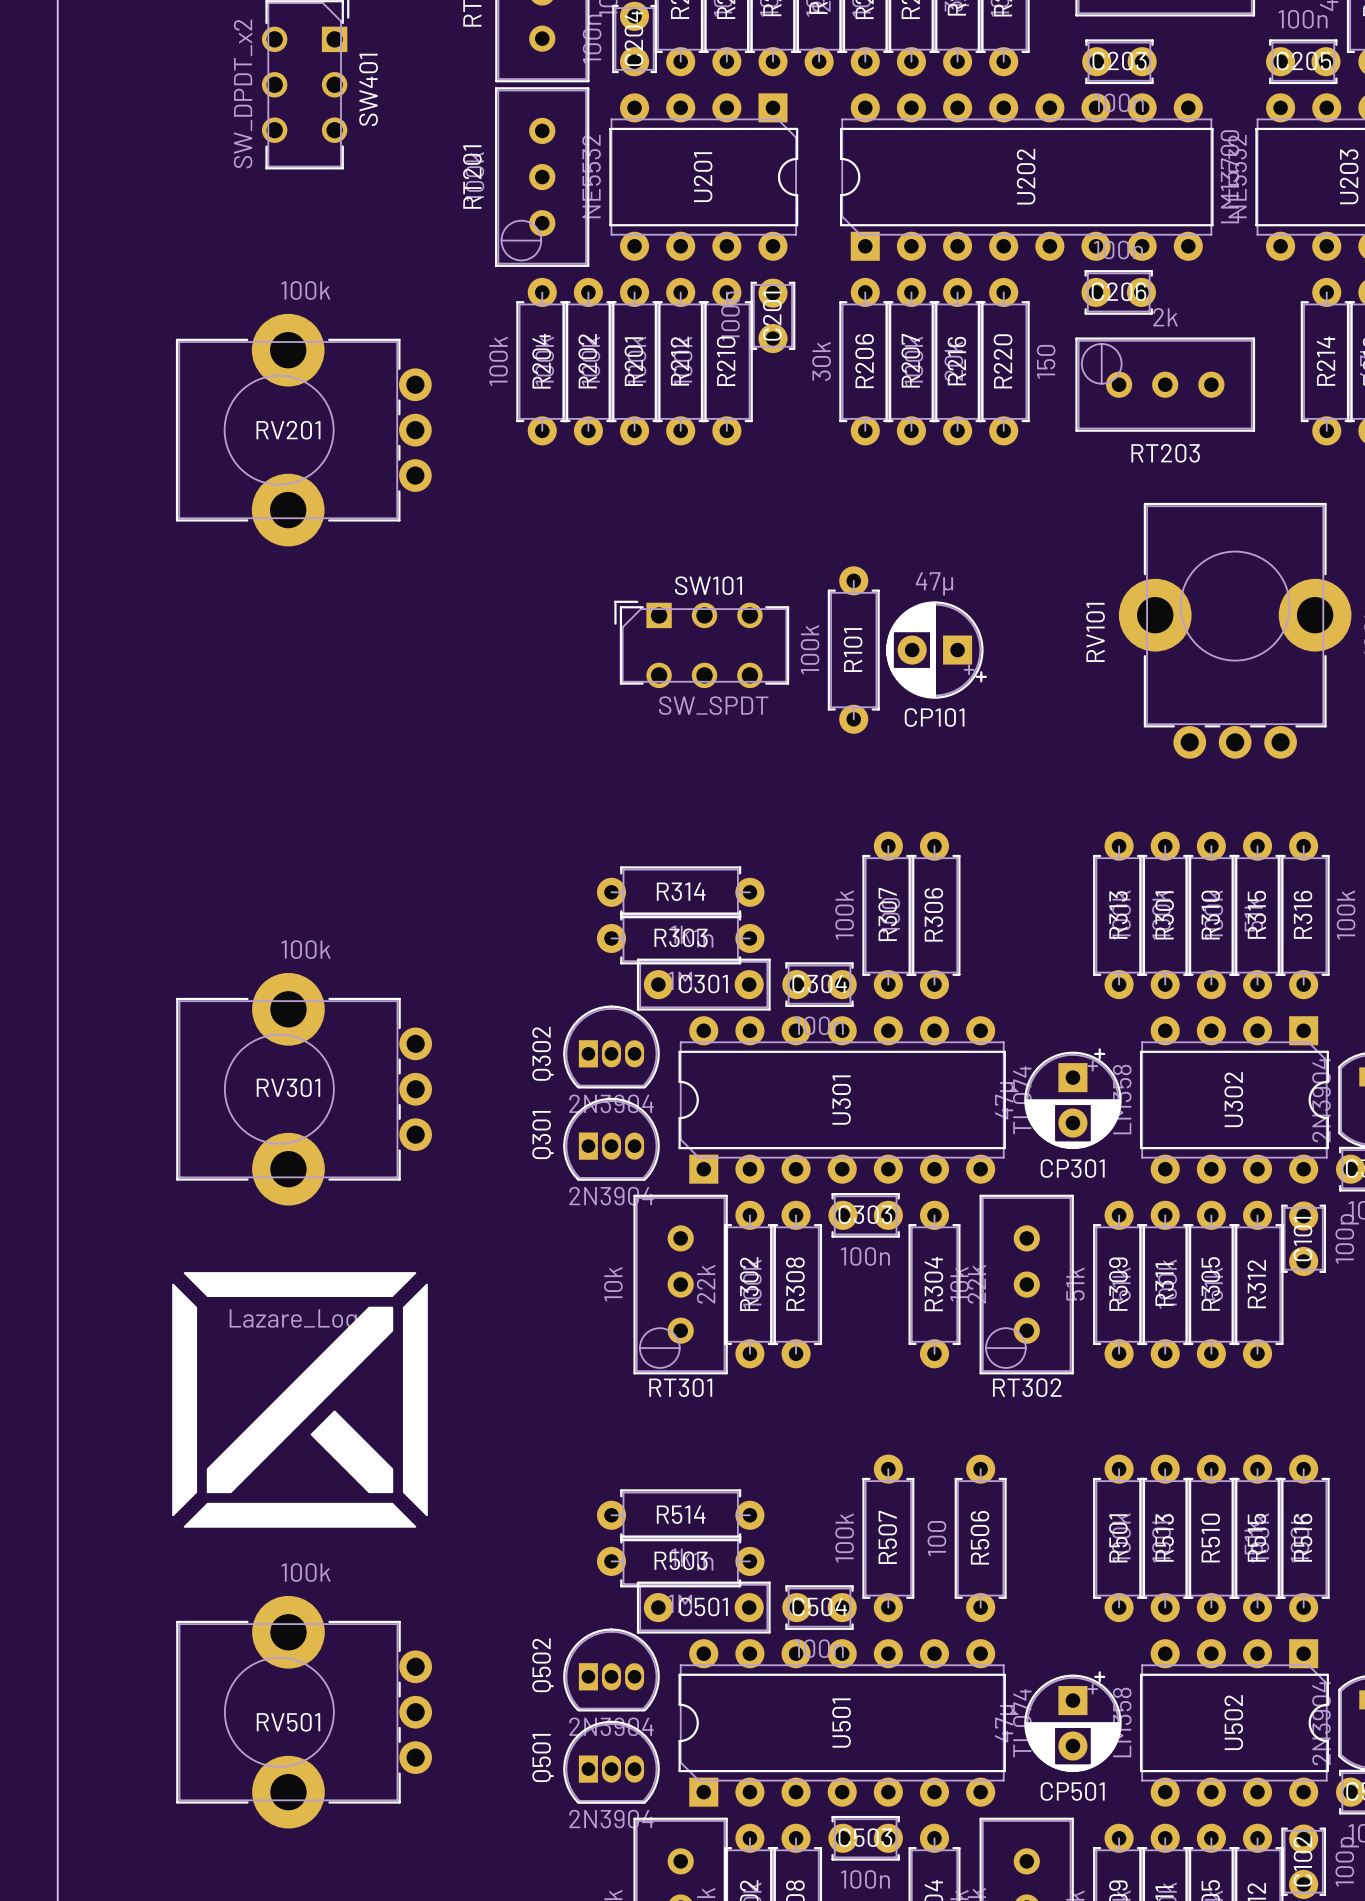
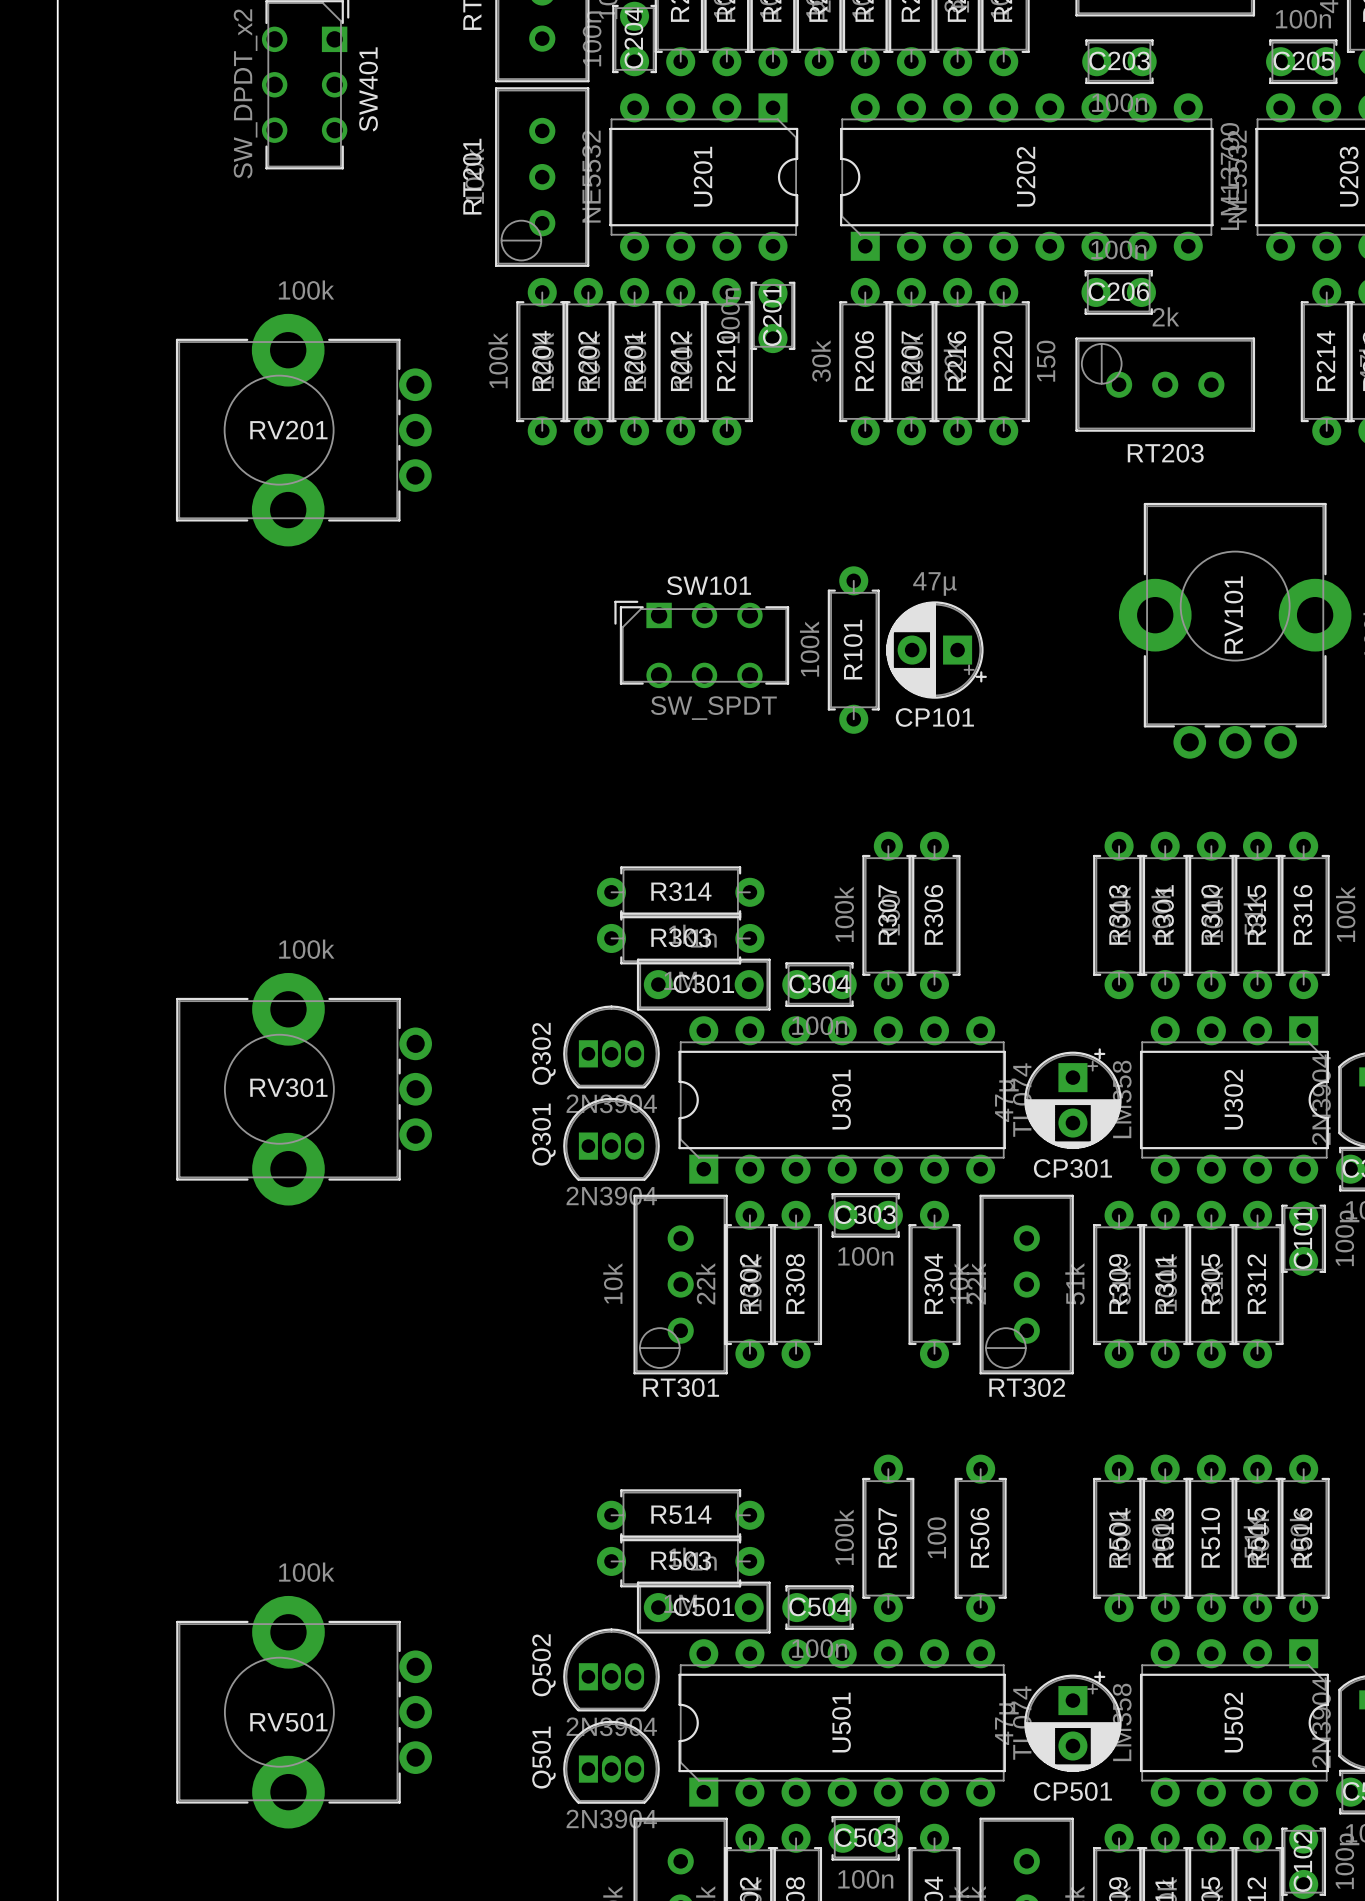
RV101 name position: RV101 (1095, 632) -> RV101 (1233, 615)
drawing: [172, 1272, 428, 1528] -> none

